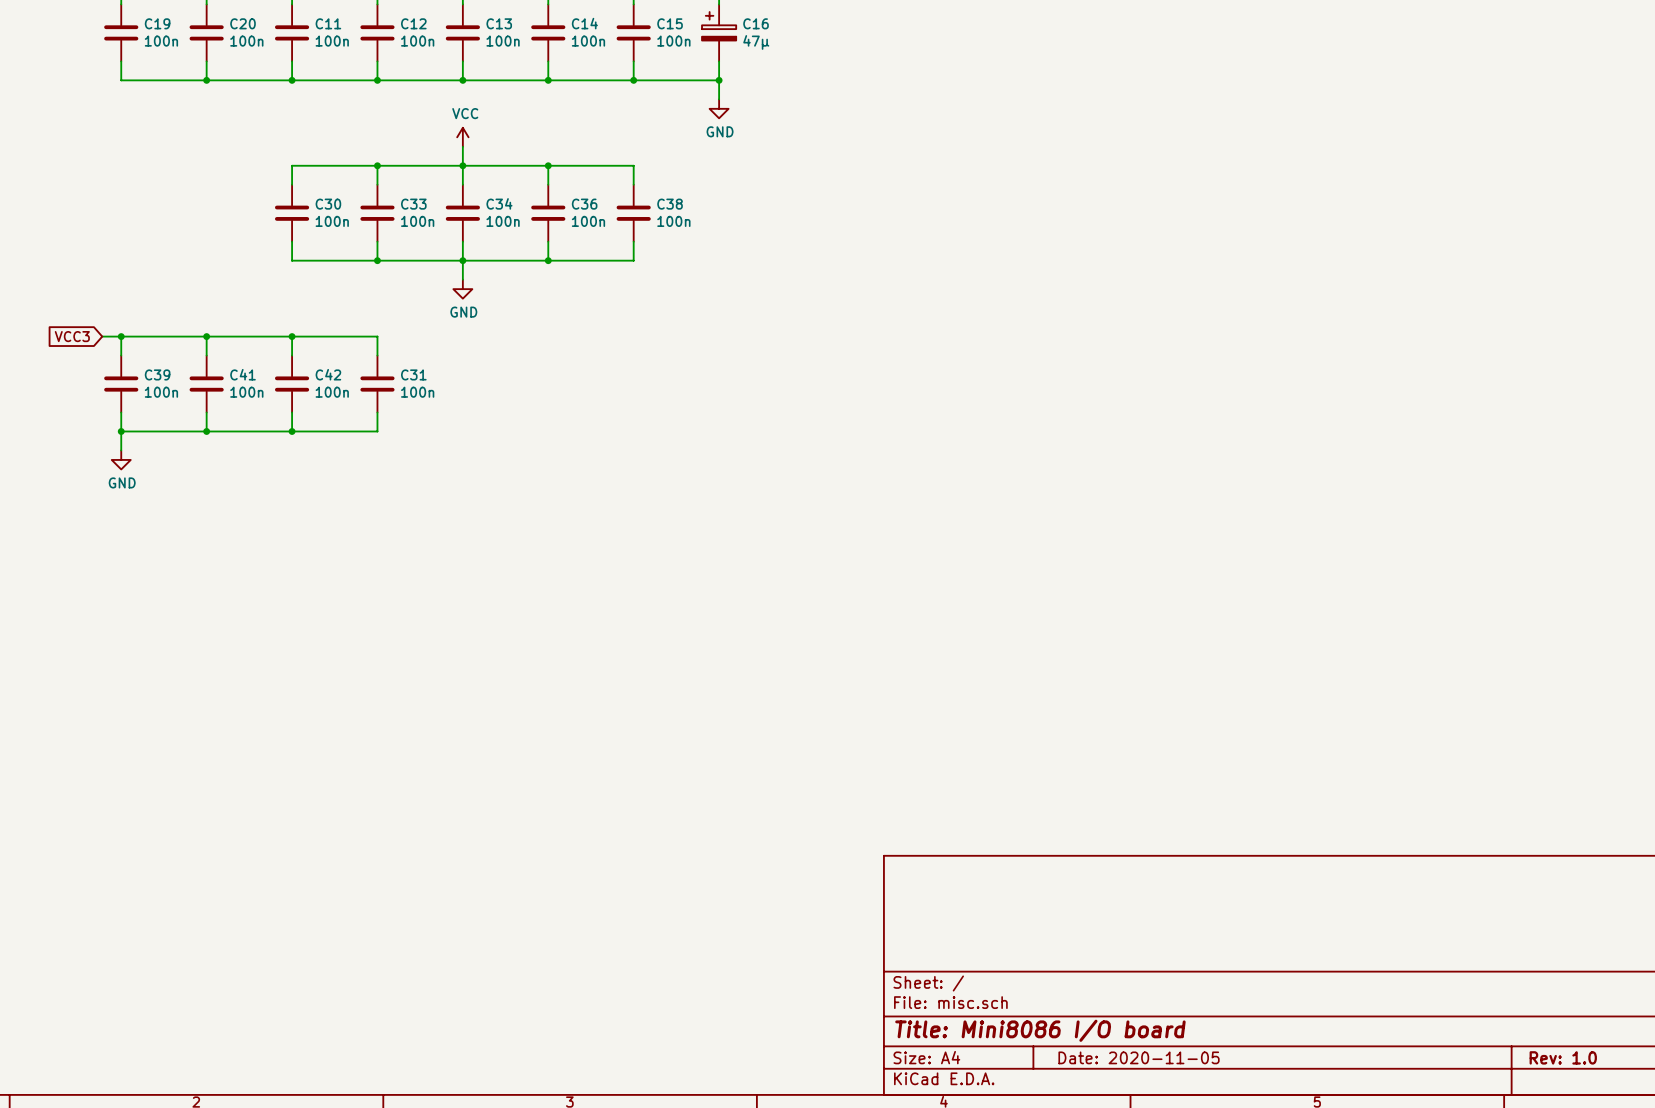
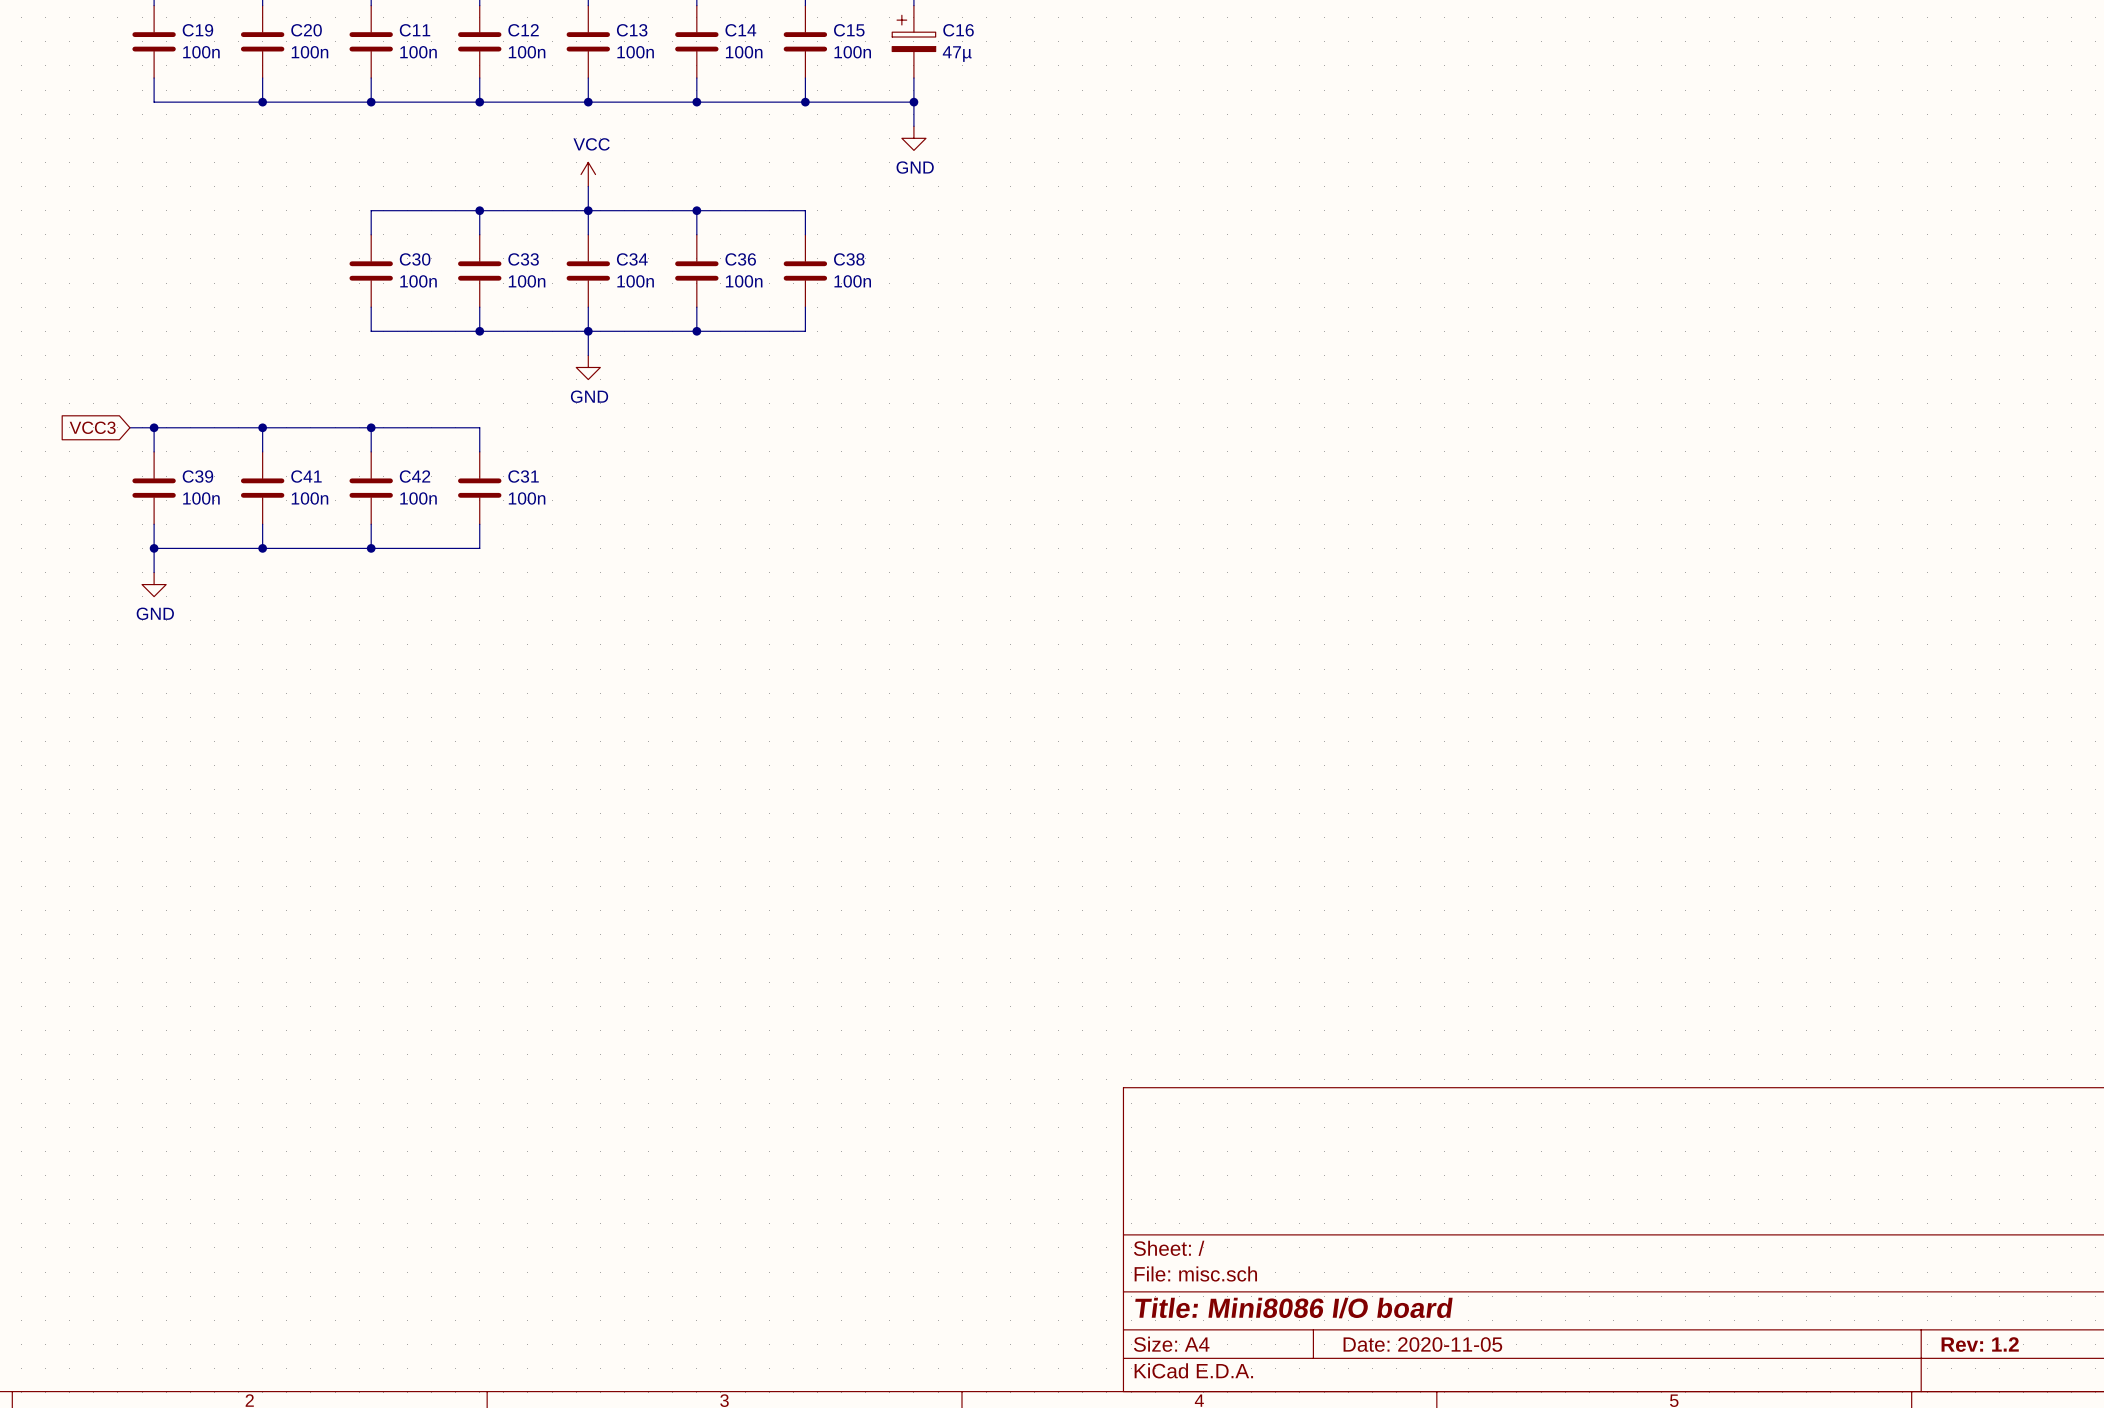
title block: Rev: 1.0 (1563, 1057) -> Rev: 1.2 (1980, 1344)

